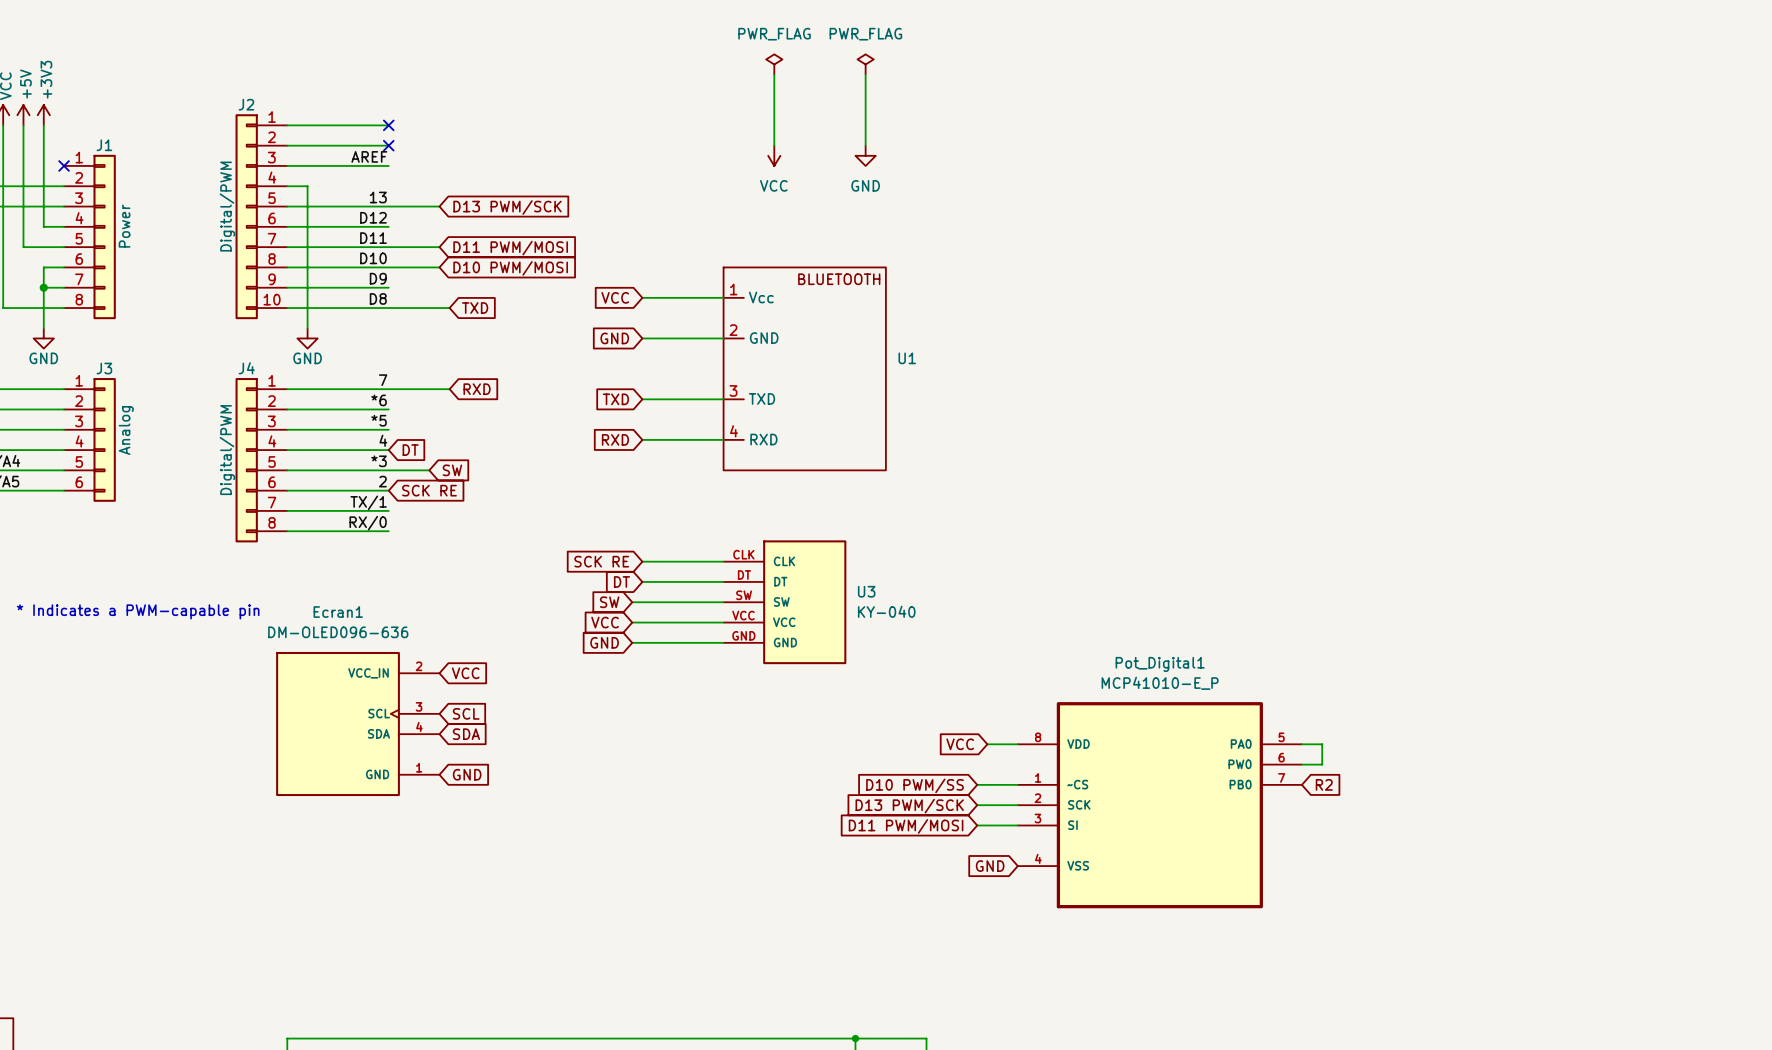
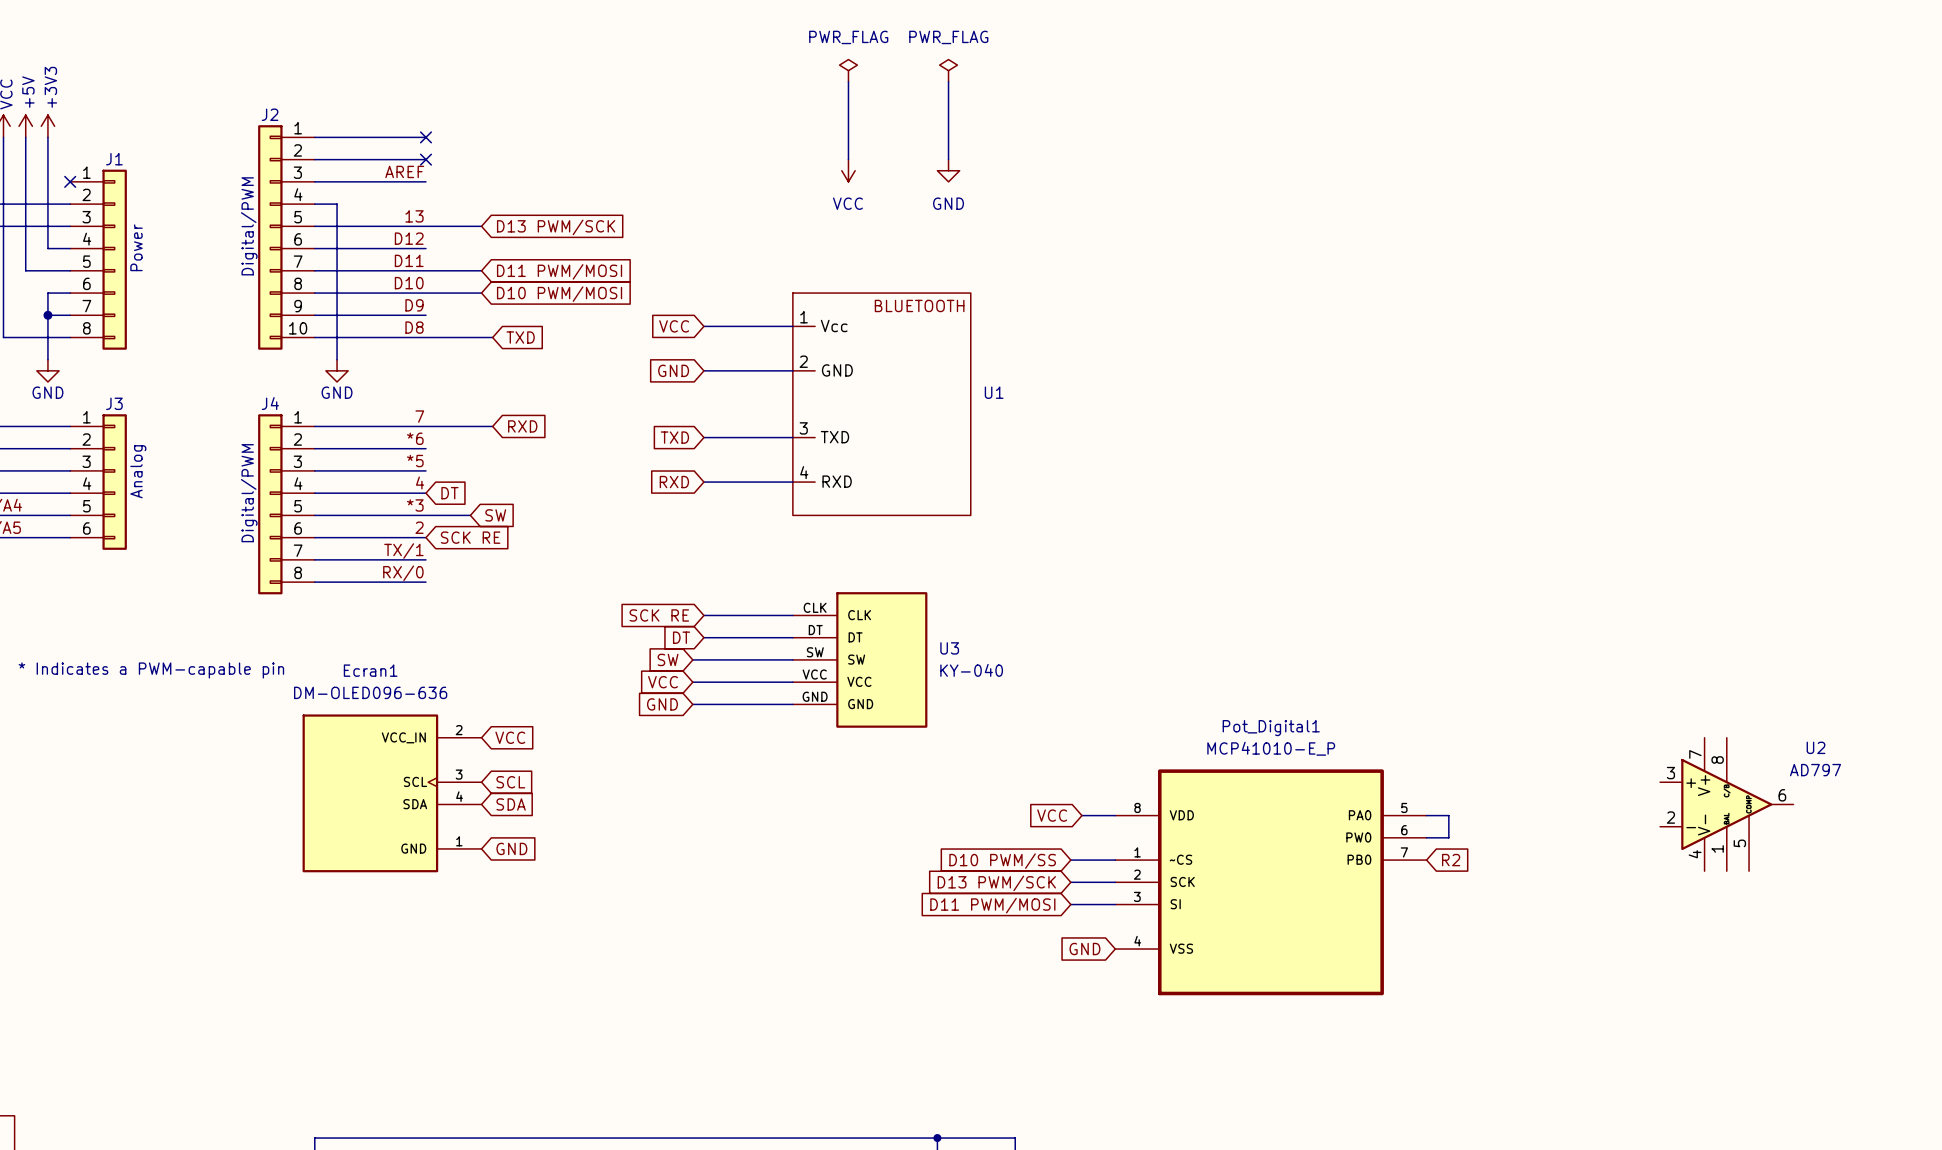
U2: none -> AD797 (1726, 804)

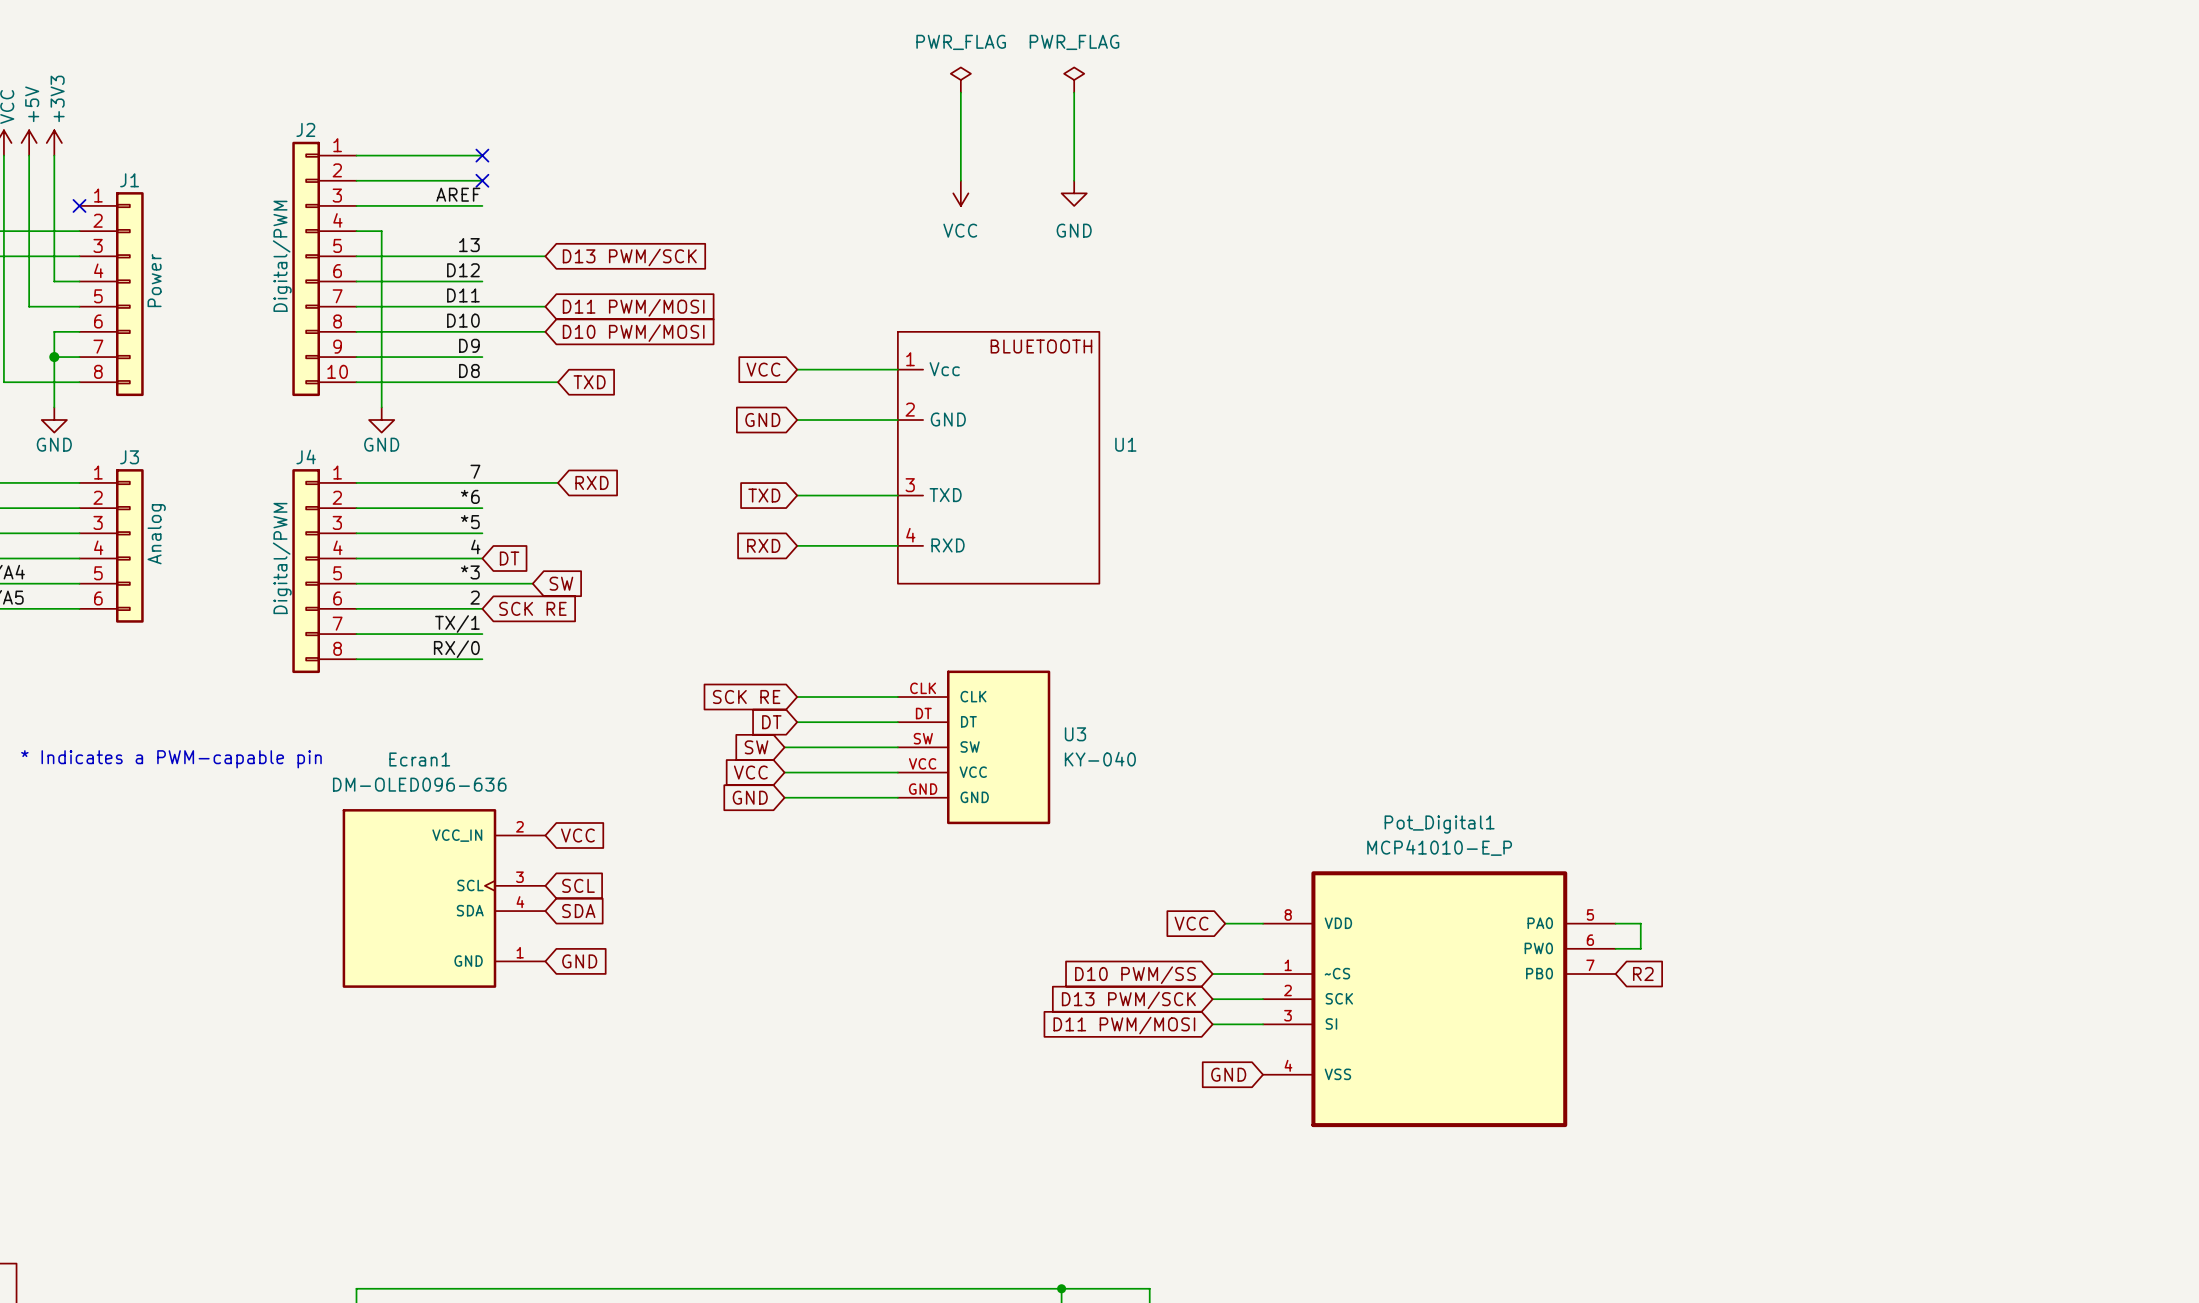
U2: AD797 (1726, 804) -> none

